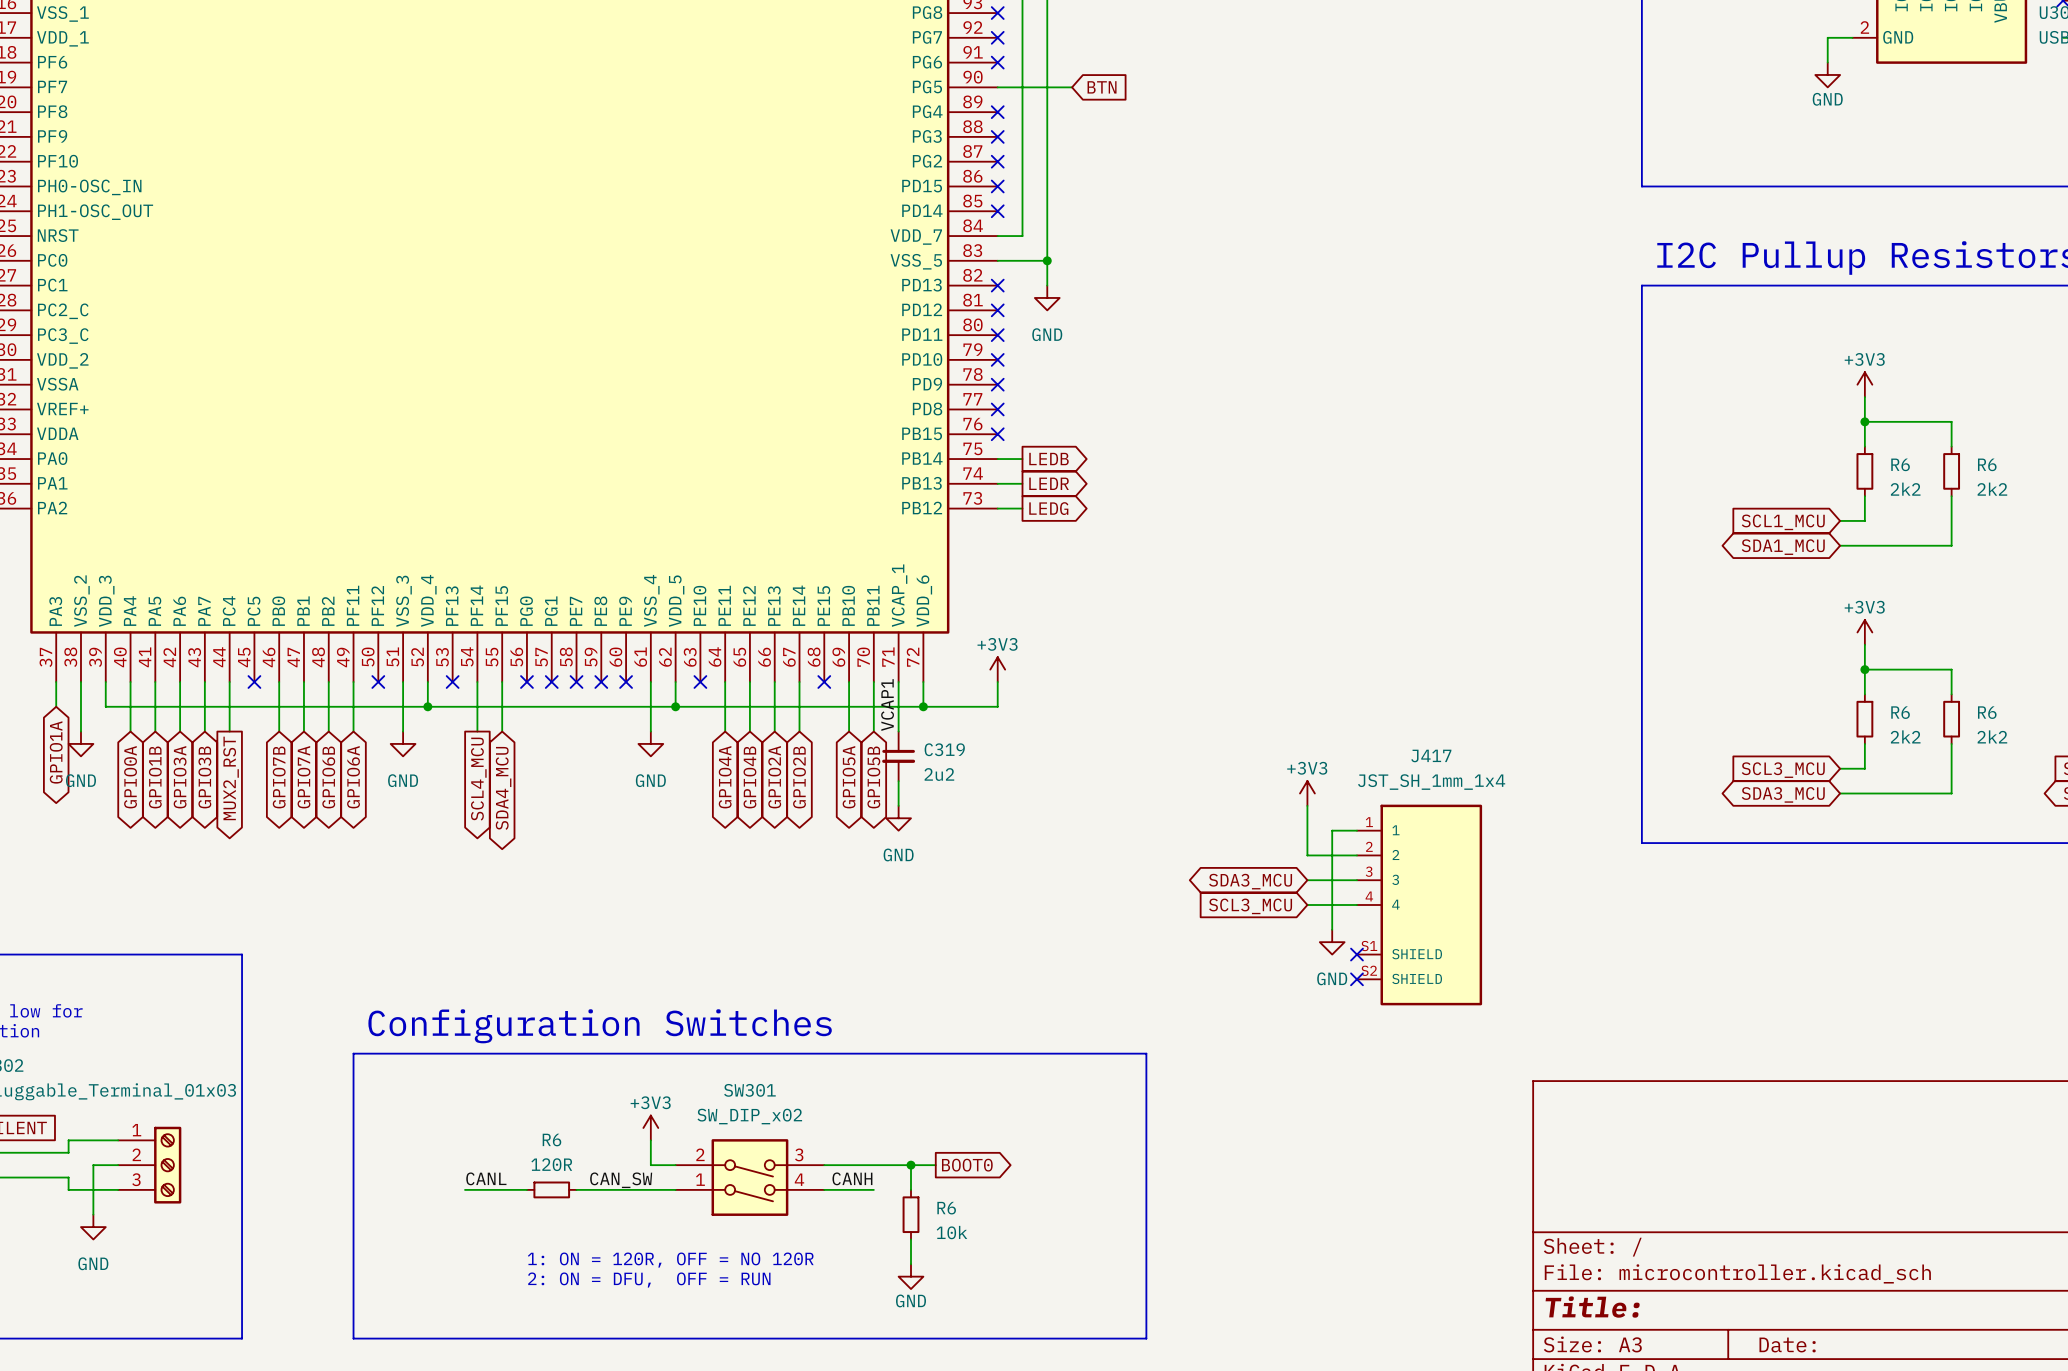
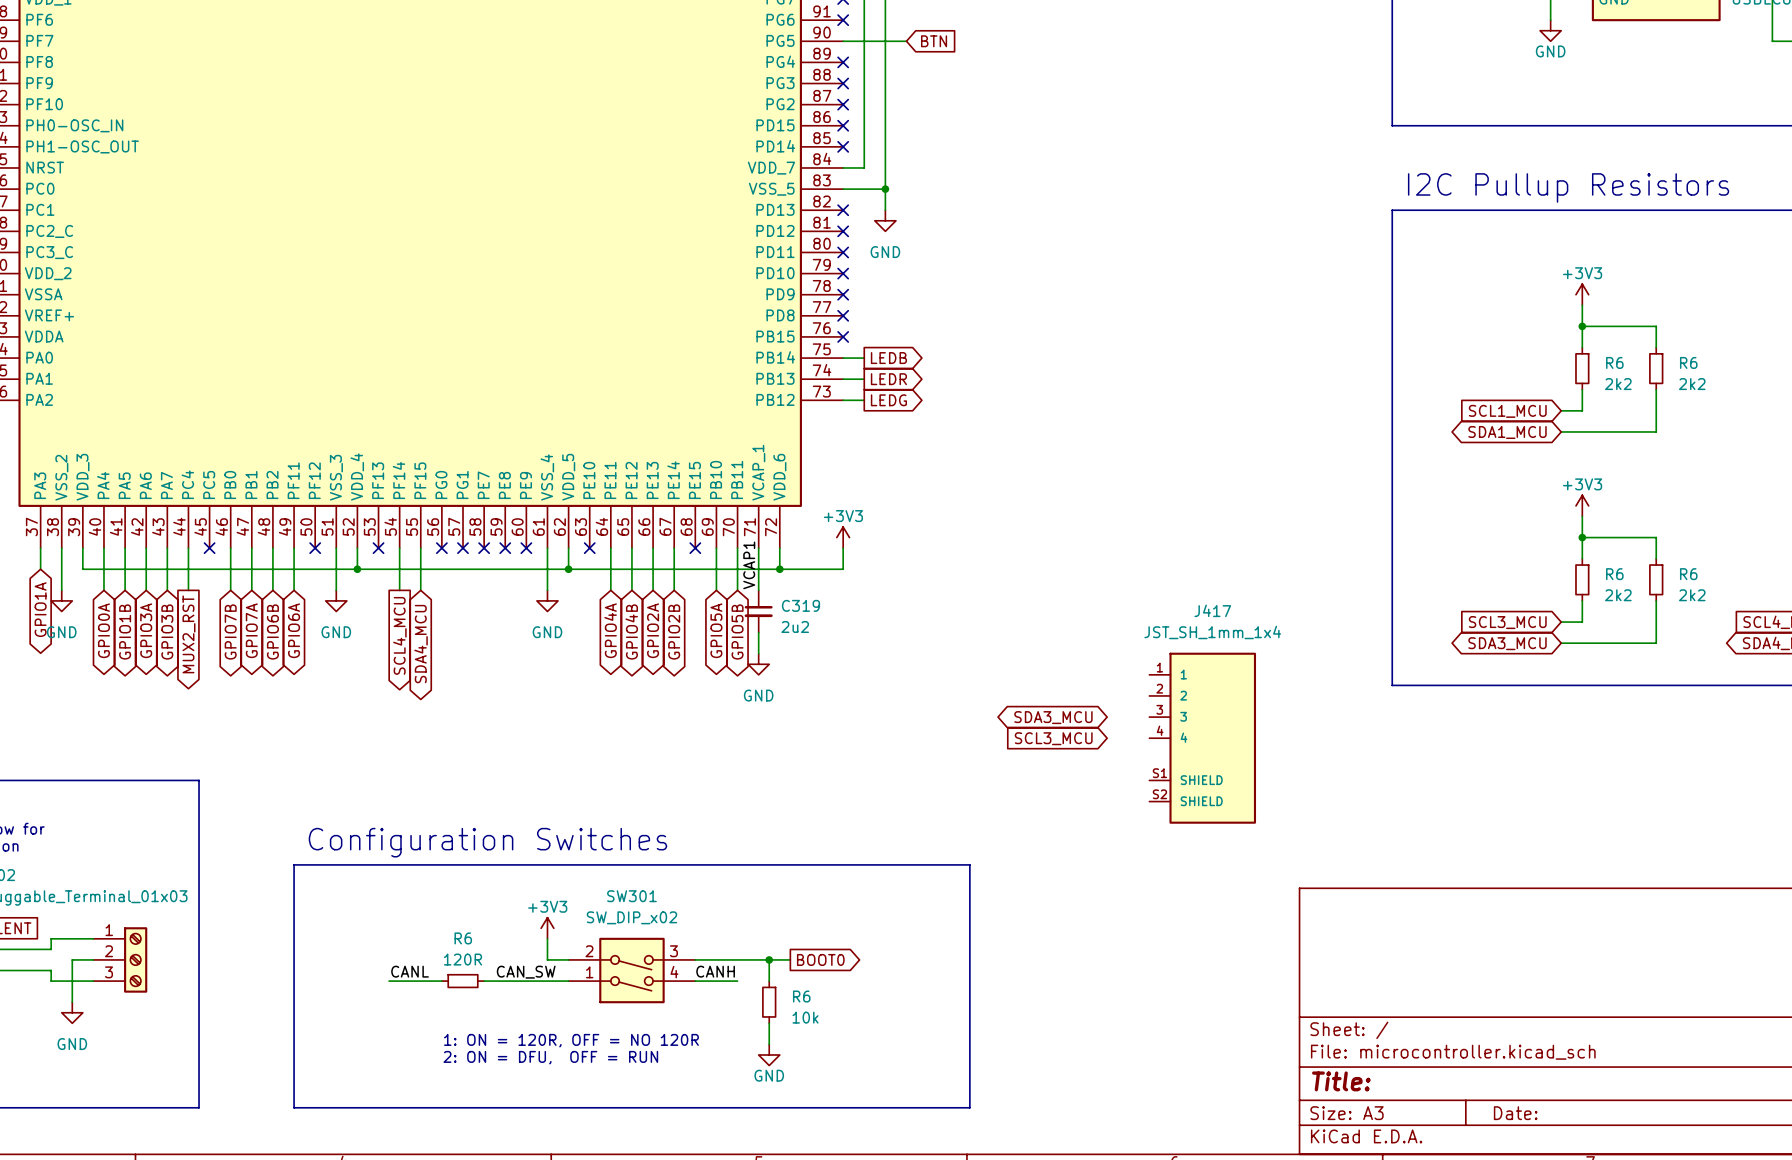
power symbol: +3V3 (1307, 793) -> none
wire: (1307, 805) (1307, 855) (1356, 855) -> none
wire: (1356, 830) (1332, 830) (1332, 929) -> none
wire: (1307, 880) (1356, 880) -> none
wire: (1307, 905) (1356, 905) -> none
power symbol: GND (1332, 942) -> none
no-connect mark: (1356, 954) -> none
no-connect mark: (1356, 979) -> none

